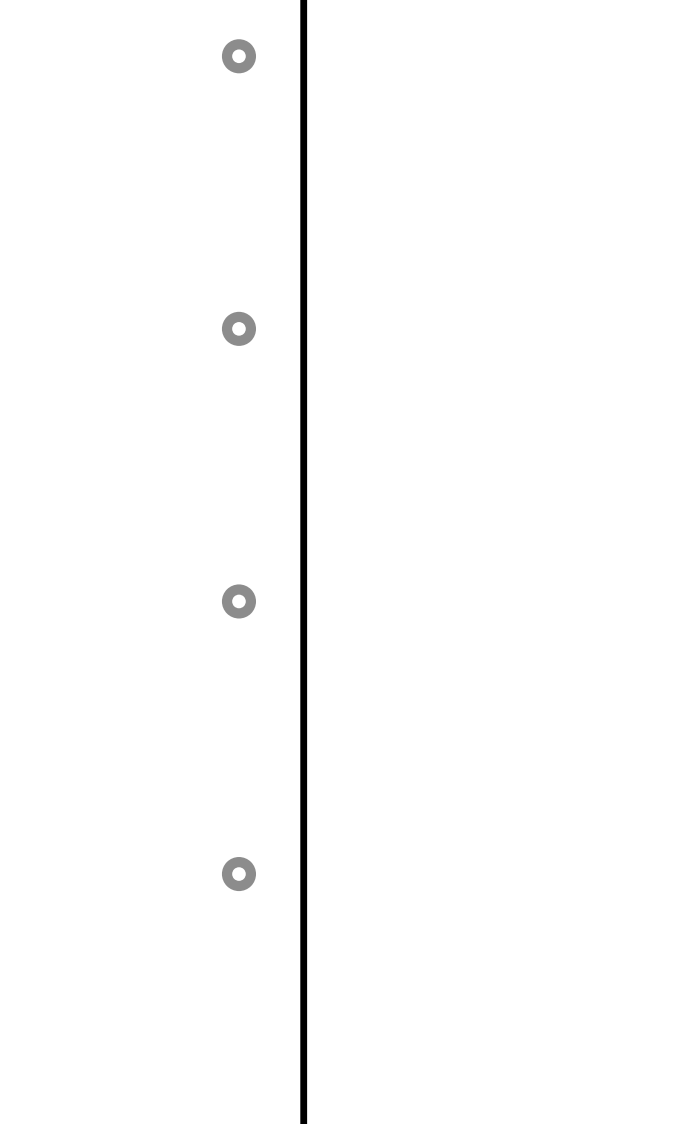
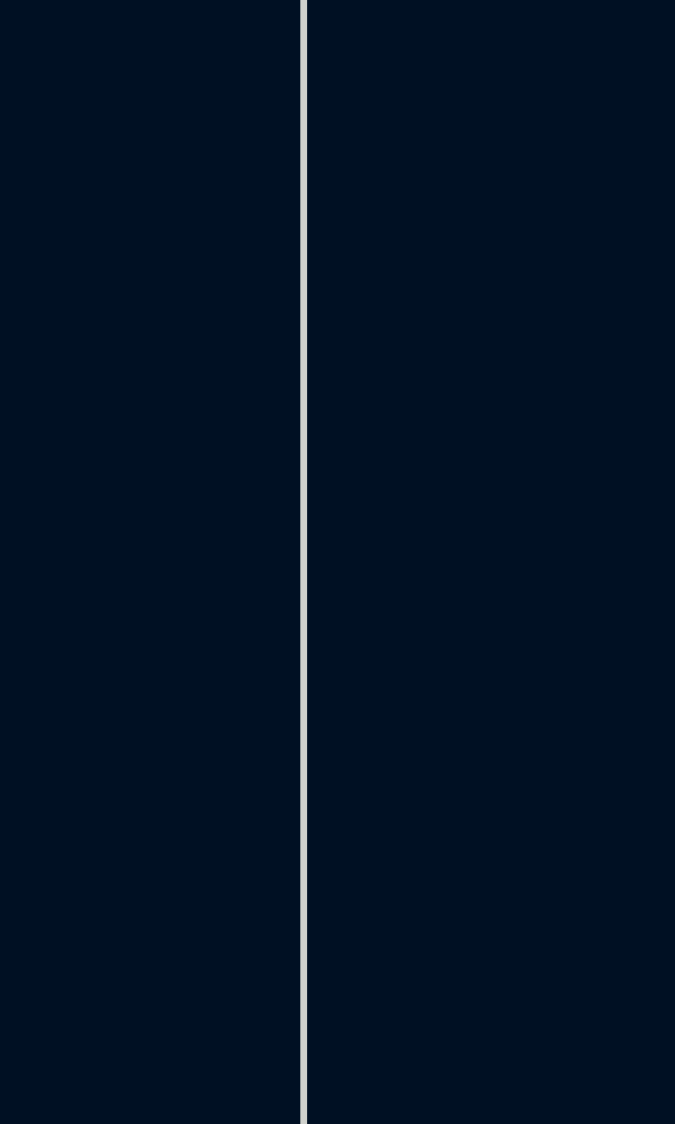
via: (238, 56) -> none
via: (238, 328) -> none
via: (238, 601) -> none
via: (238, 874) -> none

